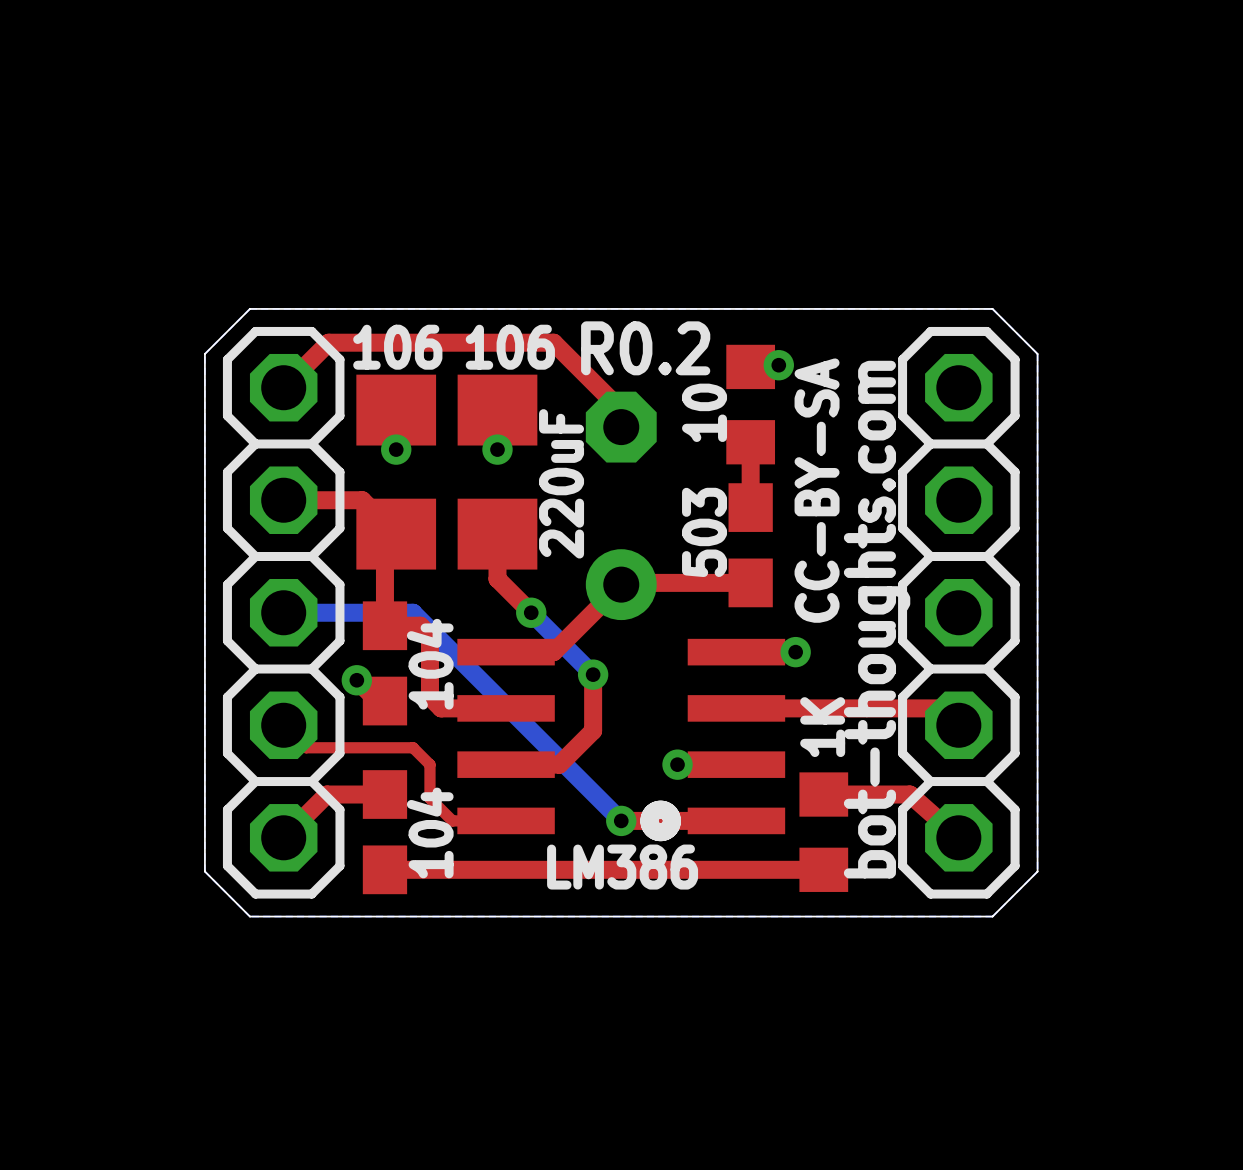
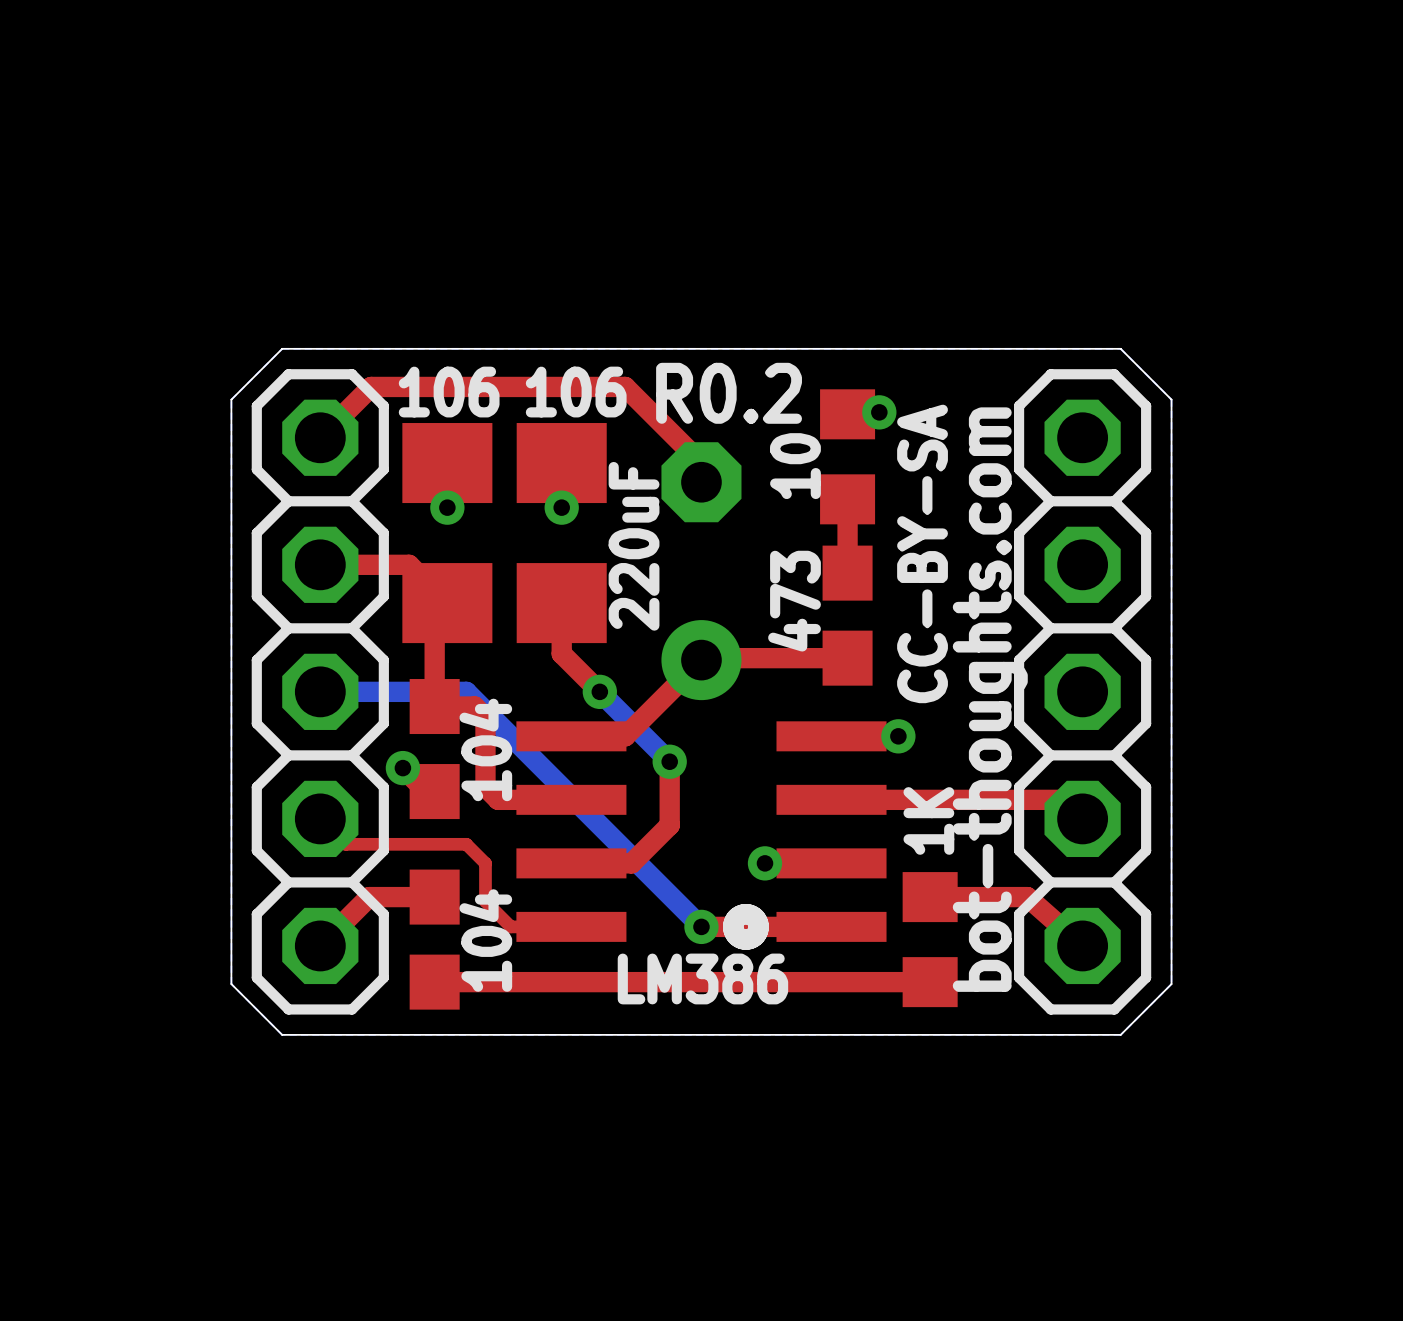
text: 503 (704, 532) -> 473 (794, 601)

